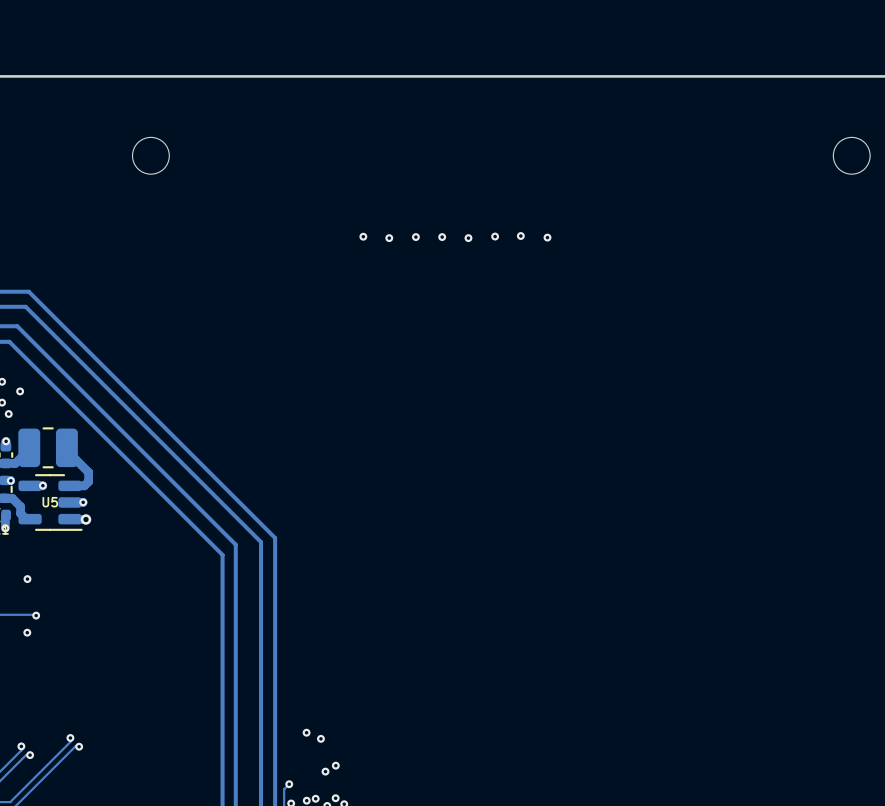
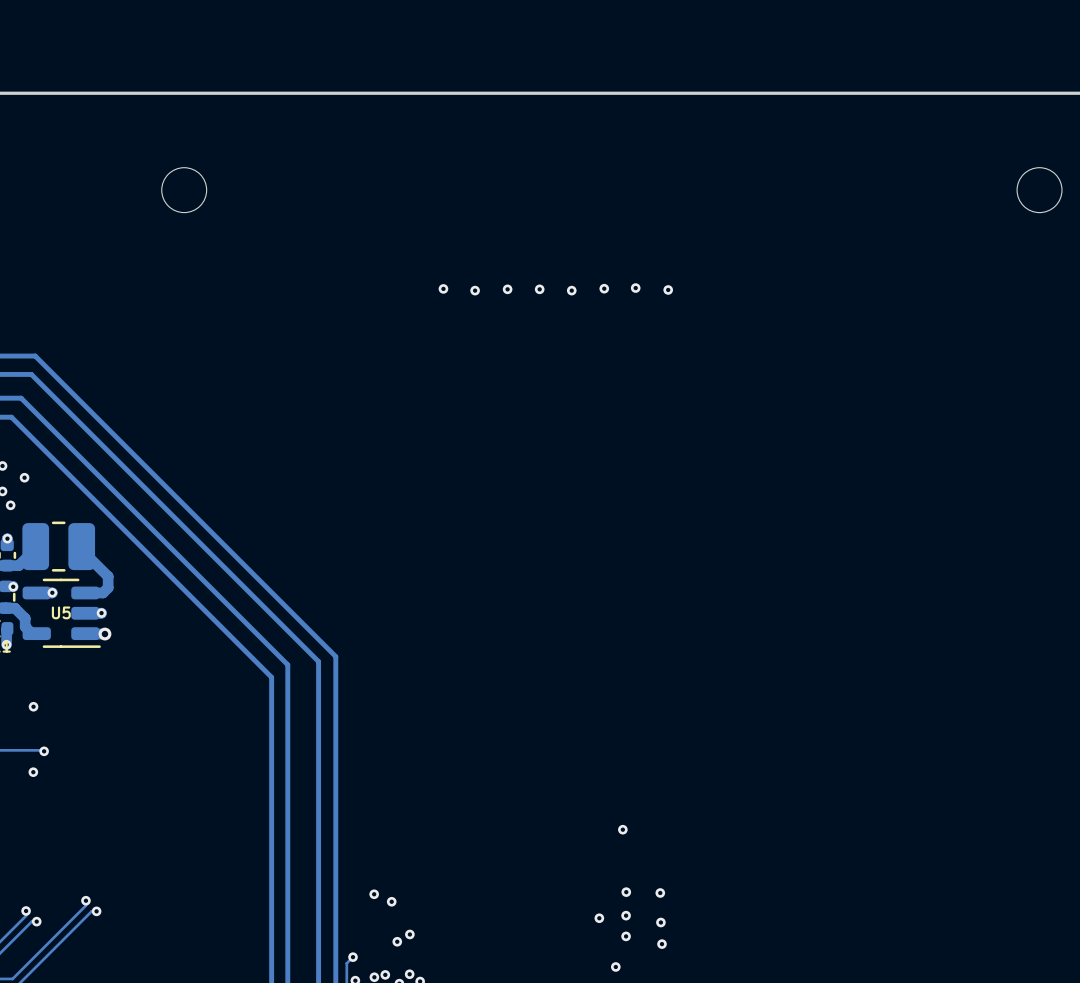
via: none -> (622, 829)
via: none -> (626, 892)
via: none -> (660, 892)
via: none -> (626, 915)
via: none -> (599, 918)
via: none -> (660, 922)
via: none -> (626, 936)
via: none -> (661, 944)
via: none -> (615, 966)

